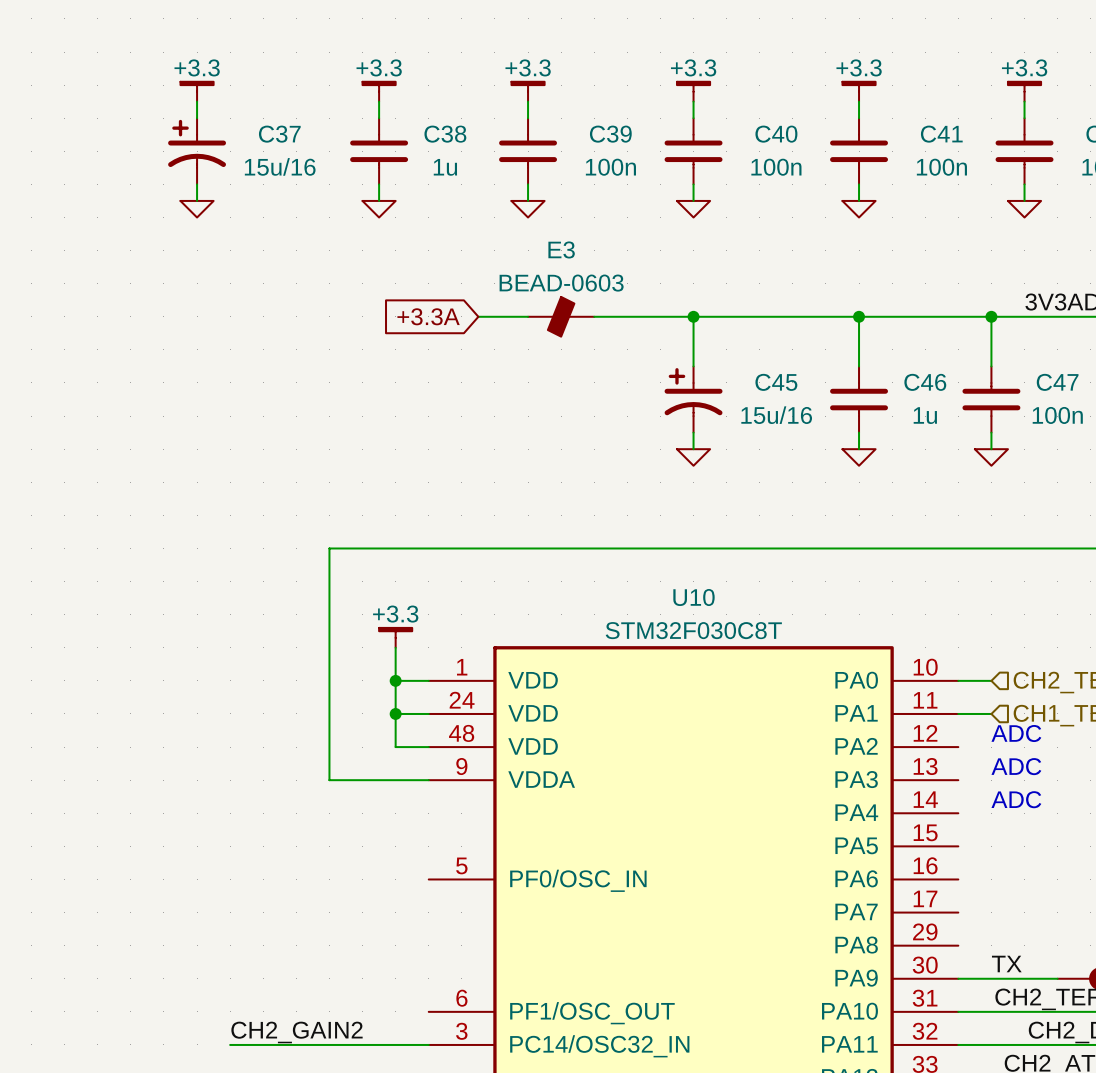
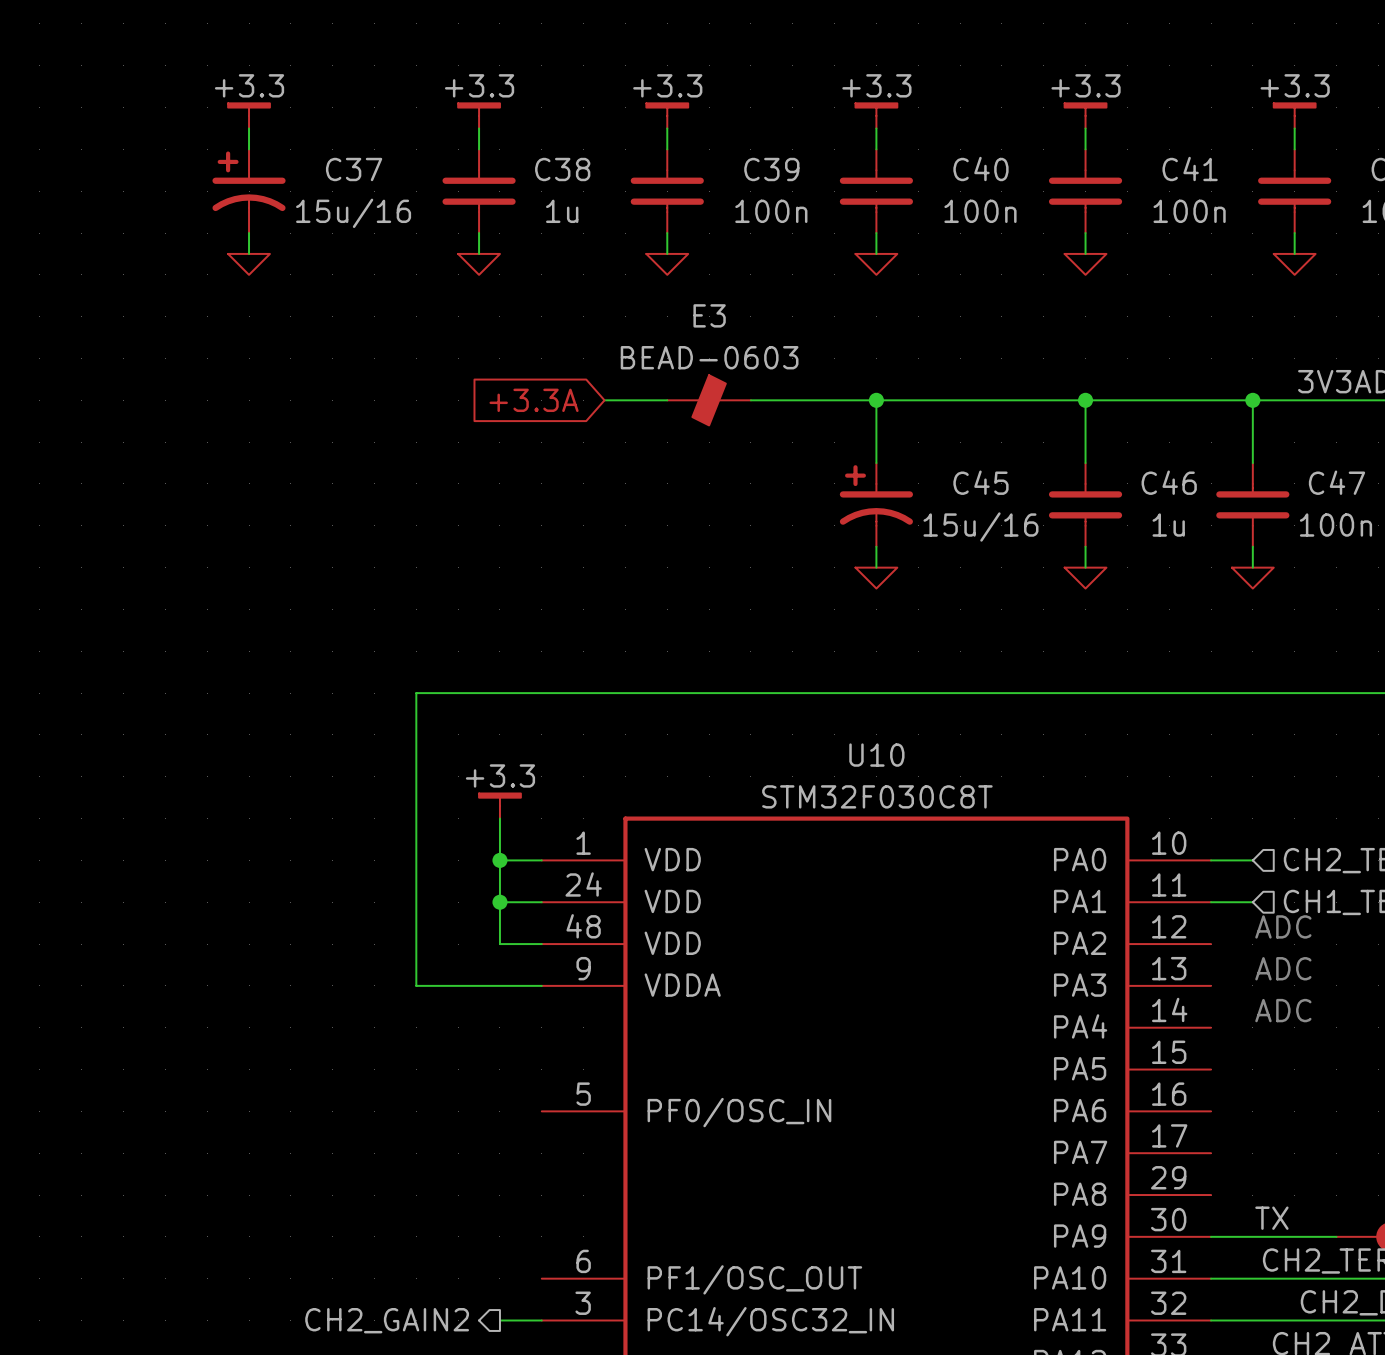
label: CH2_GAIN2 (297, 1032) -> none
wire: (230, 1044) (395, 1044) -> none
hierarchical label: none -> CH2_GAIN2 (387, 1320)

